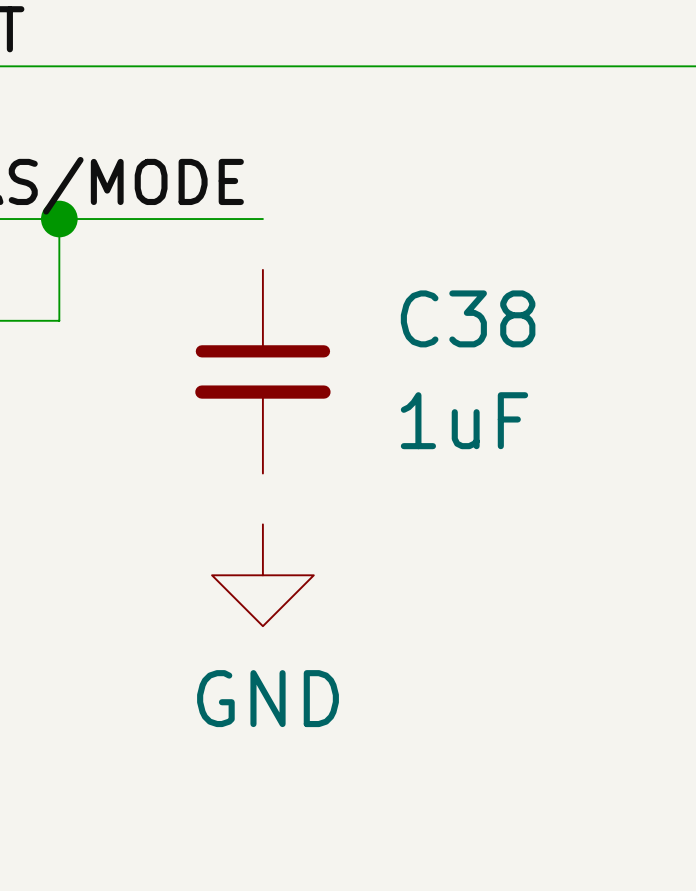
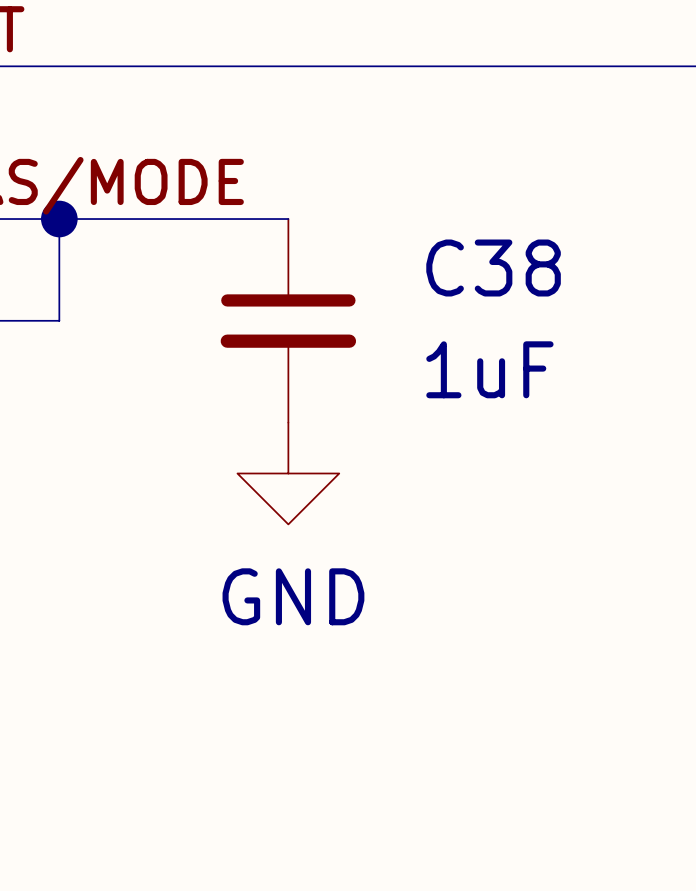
wire: none -> (262, 219) (288, 219)
C38 position: (262, 371) -> (288, 320)
power symbol position: GND (262, 575) -> GND (288, 473)

